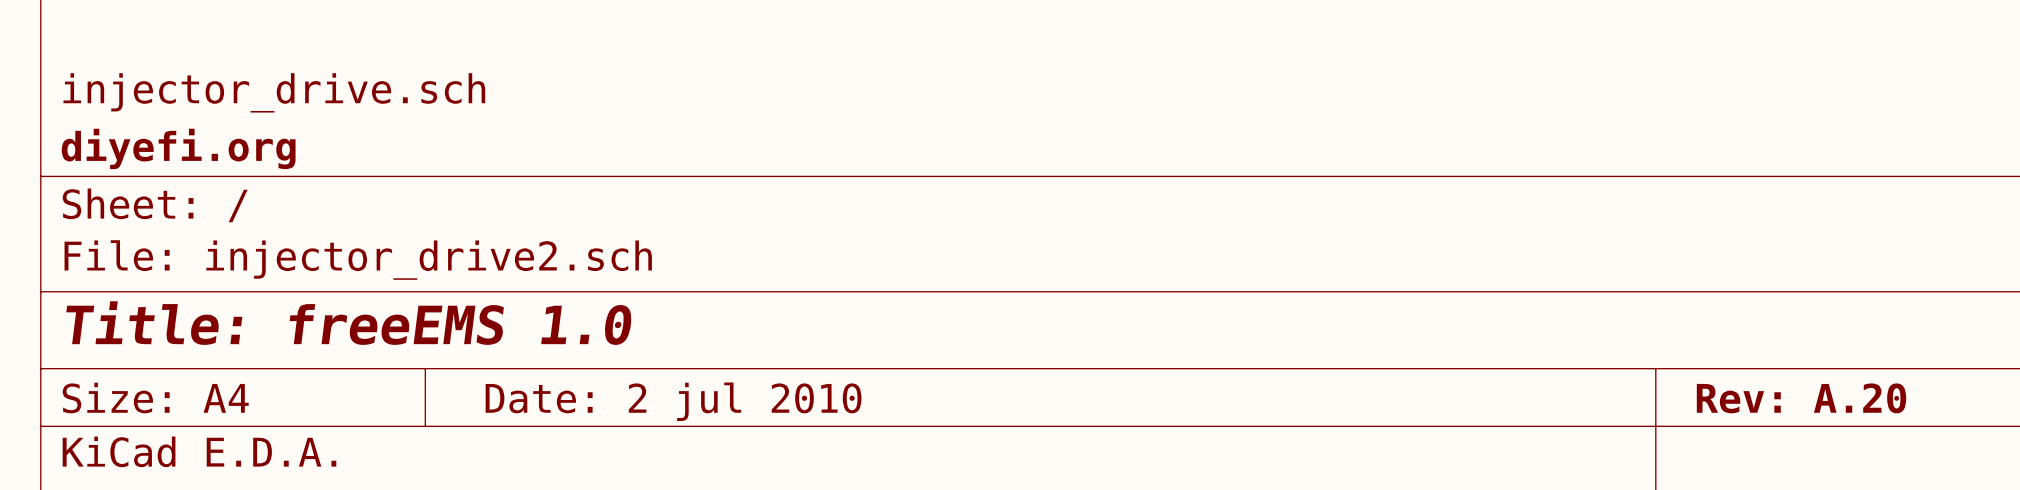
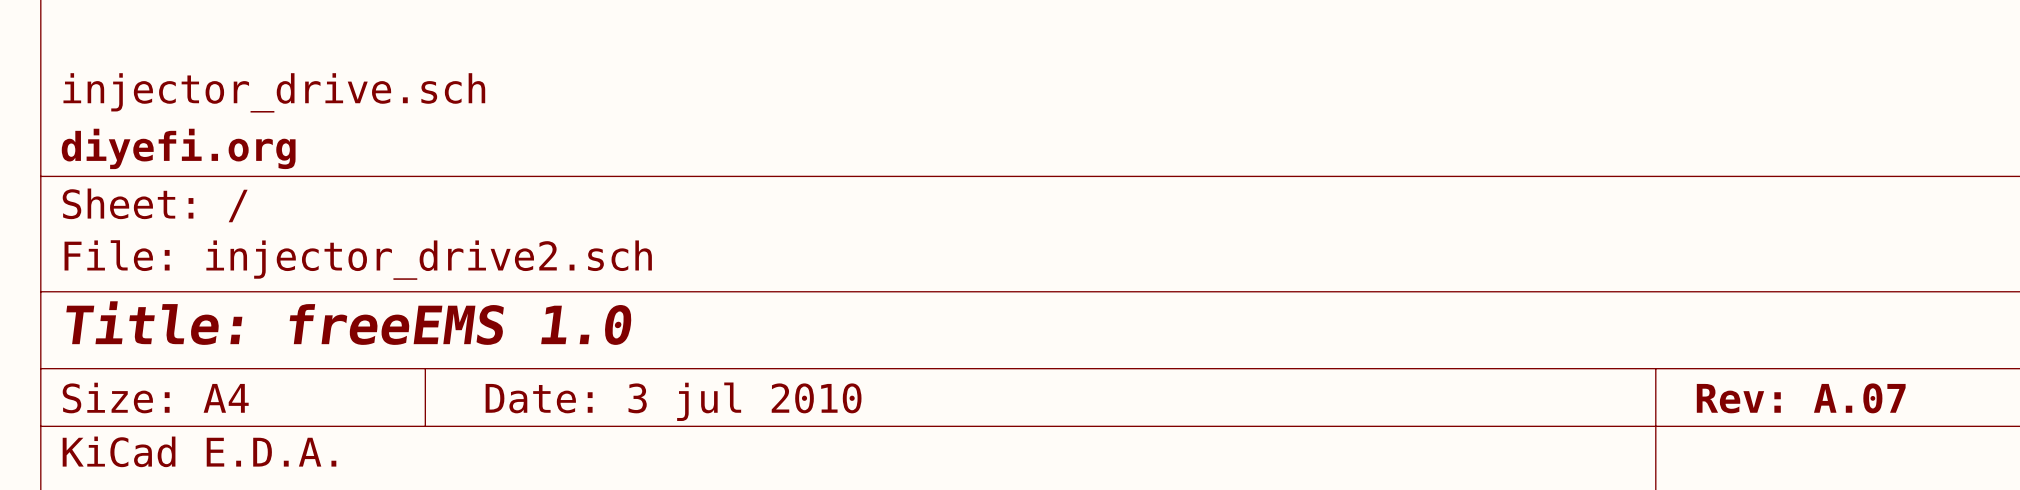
title block: Rev: A.20 (1801, 398) -> Rev: A.07 (1801, 398)
title block: Date: 2 jul 2010 (673, 401) -> Date: 3 jul 2010 (673, 401)

